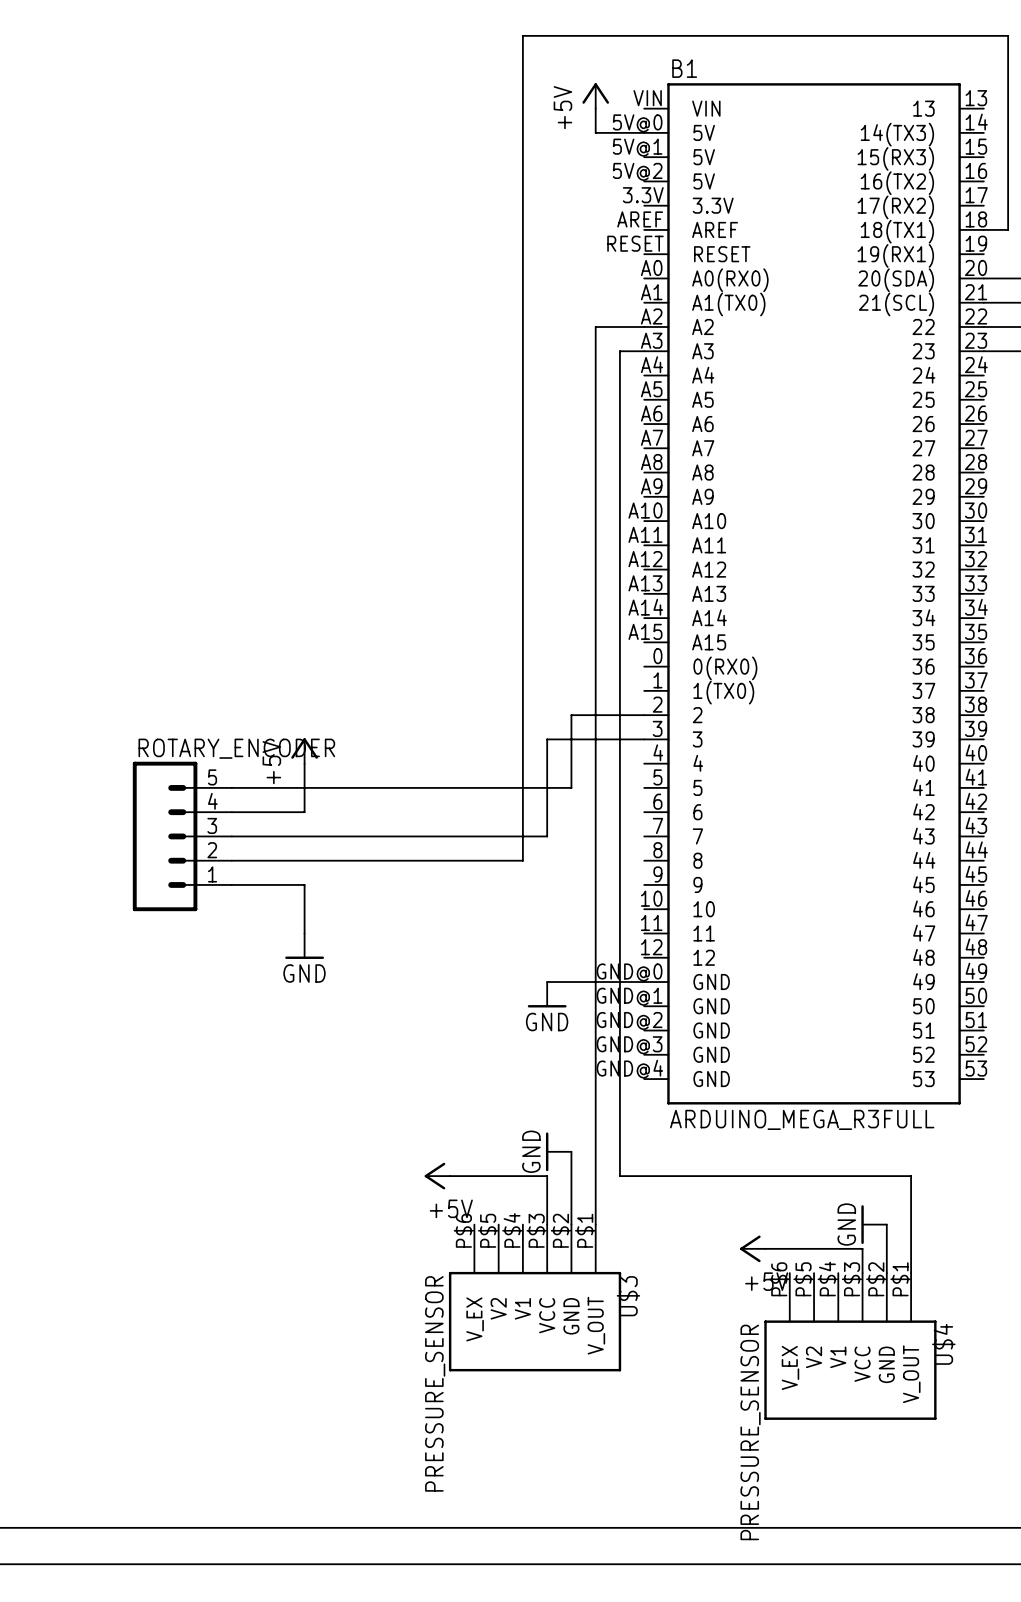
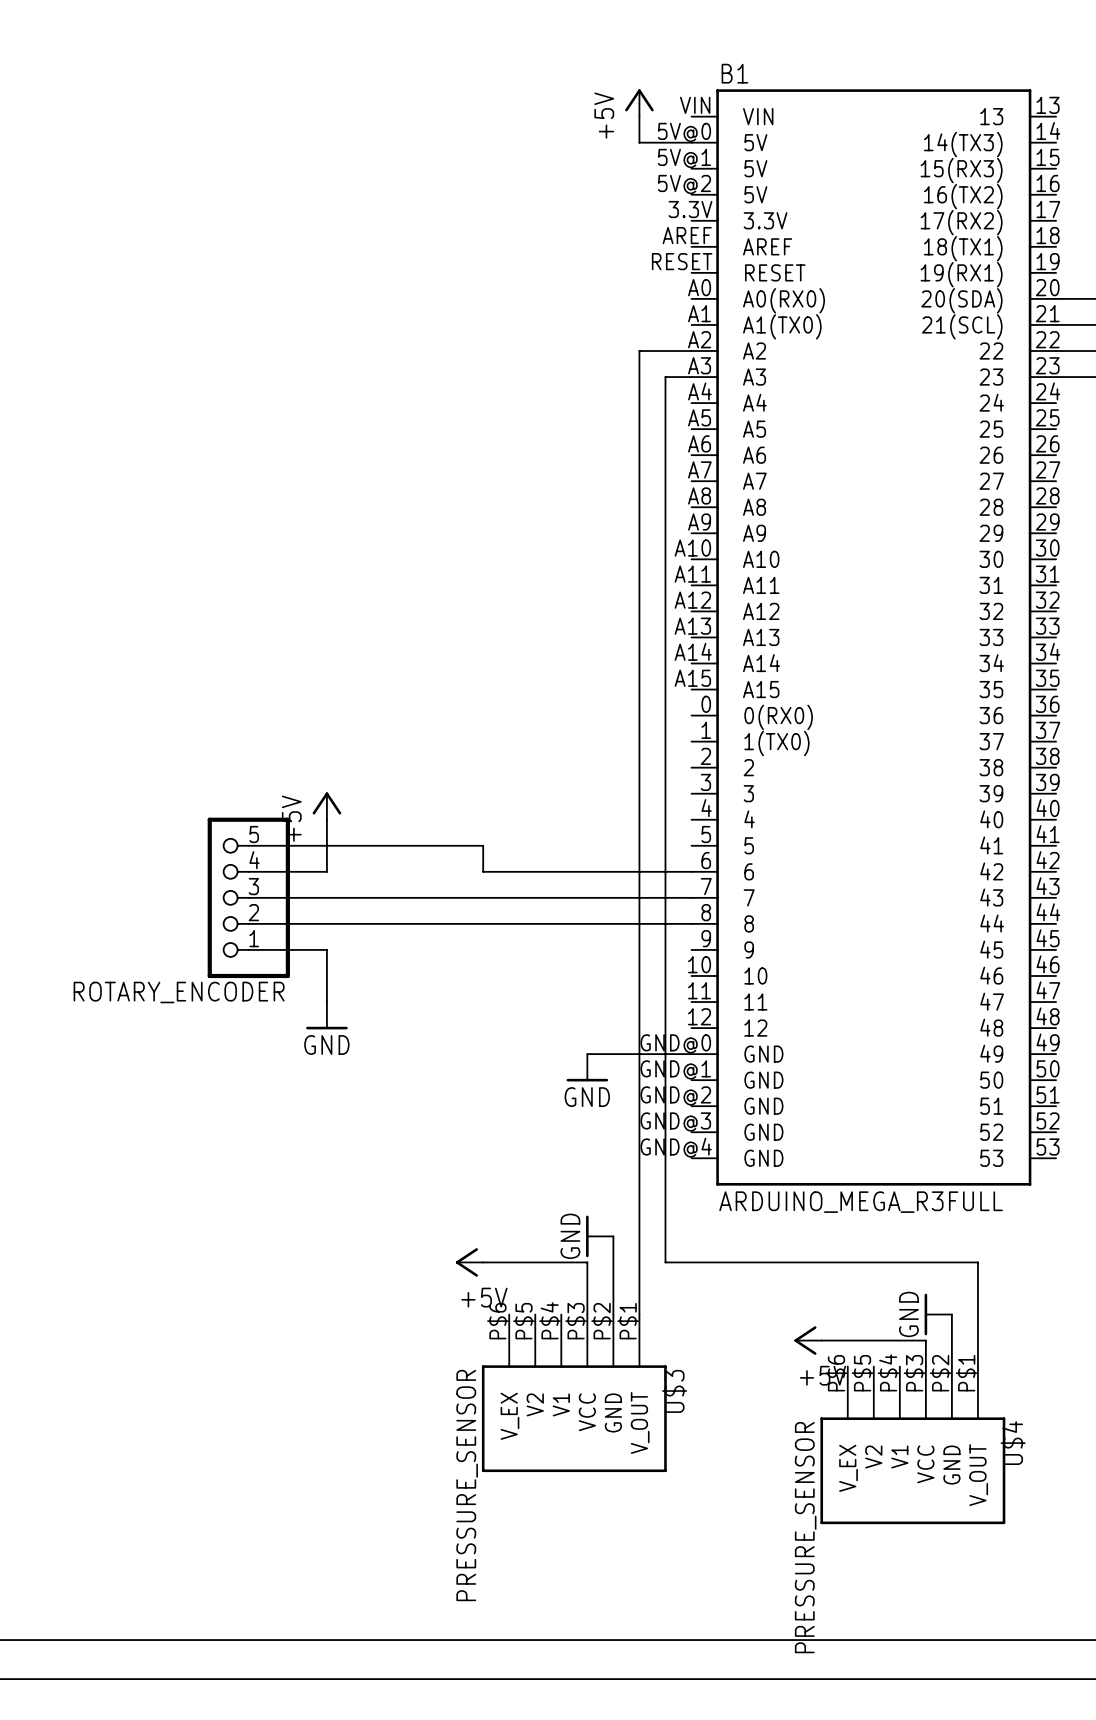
wire: (983, 229) (1008, 229) (1008, 35) (522, 35) (522, 860) -> (691, 923) (561, 923)
wire: (644, 715) (571, 715) (571, 787) (450, 787) -> (691, 871) (483, 871) (483, 845)
wire: (644, 739) (547, 739) (547, 836) -> (691, 897) (587, 897)
ROTARY_ENCODER: (182, 836) -> none
ROTARY_ENCODER: none -> (248, 897)

